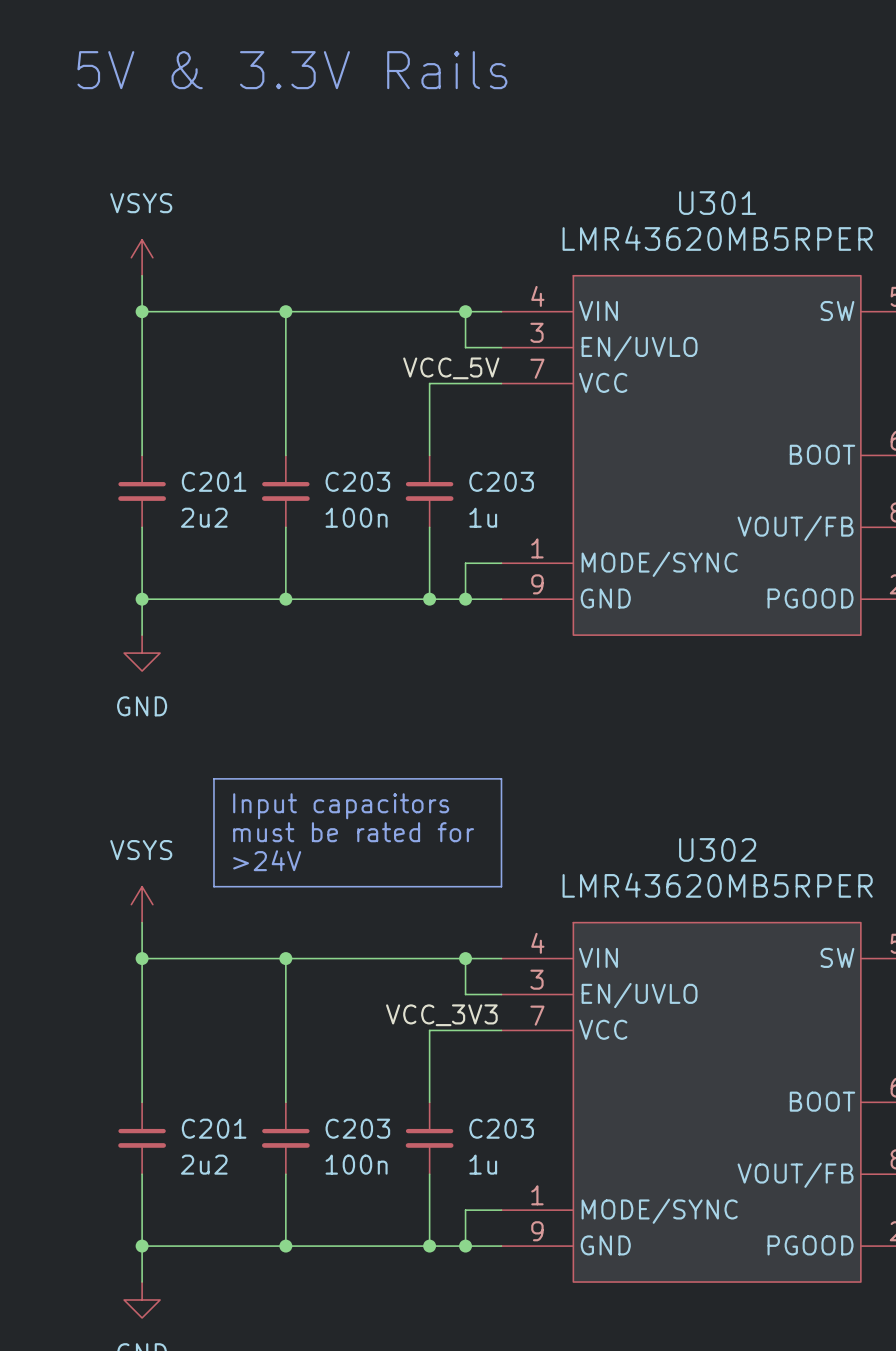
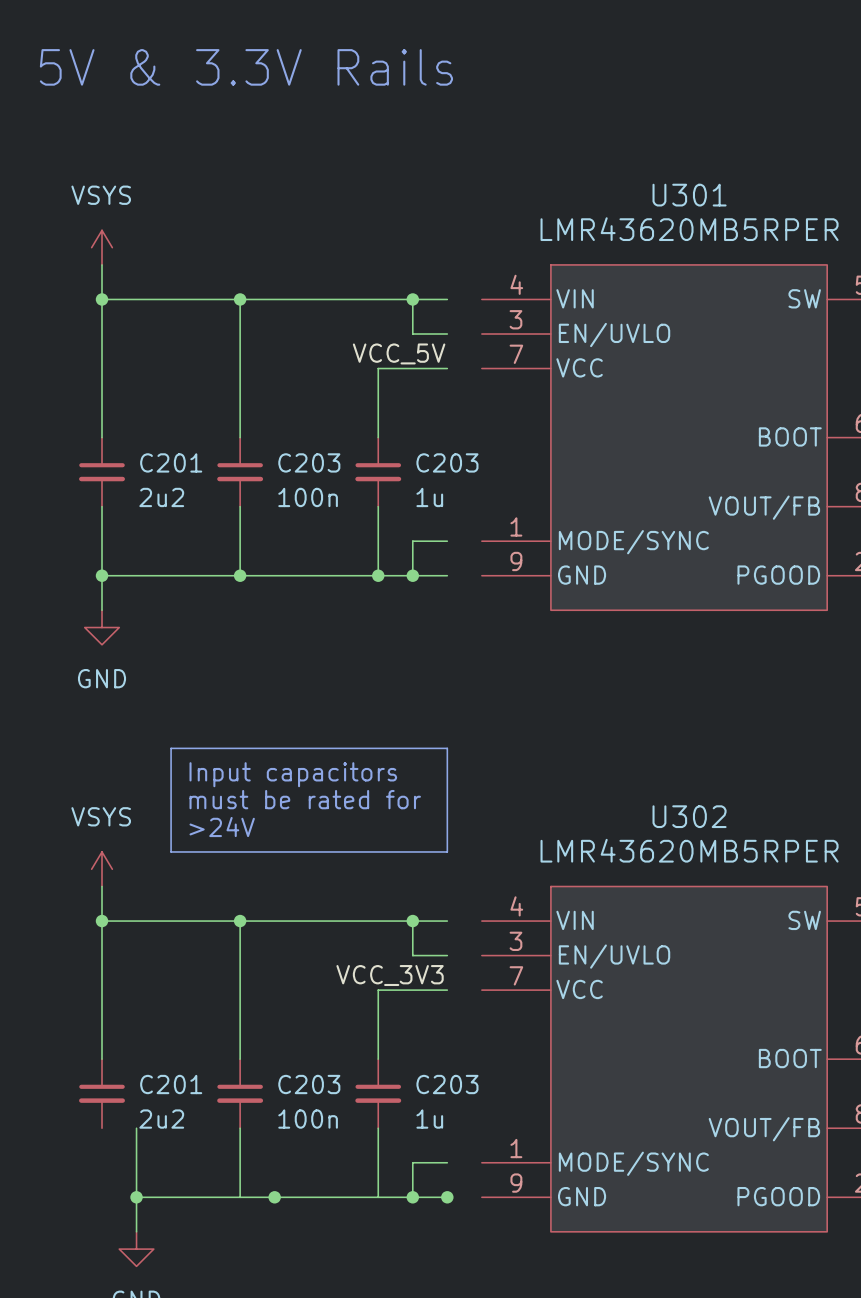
text position: 5V & 3.3V Rails (292, 70) -> 5V & 3.3V Rails (246, 67)
power symbol position: VSYS (142, 257) -> VSYS (102, 247)
wire: (142, 275) (142, 455) -> (102, 264) (102, 437)
wire: none -> (102, 299) (136, 299)
junction position: (142, 311) -> (102, 299)
wire: (285, 311) (285, 455) -> (240, 299) (240, 437)
junction position: (285, 311) -> (240, 299)
wire: none -> (412, 299) (412, 334) (447, 334)
junction position: (465, 311) -> (412, 299)
wire: (501, 311) (465, 311) (465, 347) (501, 347) -> none
label position: VCC_5V (451, 368) -> VCC_5V (399, 353)
wire: (429, 383) (429, 455) -> (412, 368) (378, 368) (378, 437)
wire: (465, 383) (501, 383) -> none
C201 position: (142, 491) -> (102, 472)
C203 position: (285, 491) -> (240, 472)
C203 position: (429, 491) -> (378, 472)
wire: (142, 527) (142, 635) -> (102, 506) (102, 610)
wire: (285, 527) (285, 599) -> (240, 506) (240, 575)
wire: none -> (378, 506) (378, 575)
wire: (429, 527) (429, 563) -> (447, 541) (412, 541)
wire: (501, 563) (465, 563) (465, 599) (501, 599) -> none
wire: none -> (102, 575) (136, 575)
junction position: (142, 599) -> (102, 575)
junction position: (285, 599) -> (240, 575)
junction: none -> (378, 575)
junction: (465, 599) -> none
power symbol position: GND (142, 653) -> GND (102, 627)
line: (213, 778) (213, 886) -> (205, 748) (171, 748) (171, 851) (205, 851)
line: (465, 778) (501, 778) (501, 886) (465, 886) -> (447, 748) (447, 851)
text position: Input capacitors (341, 806) -> Input capacitors (293, 774)
text position: must be rated for (353, 832) -> must be rated for (305, 799)
text position: >24V (267, 860) -> >24V (222, 827)
power symbol position: VSYS (142, 904) -> VSYS (102, 869)
wire: (142, 922) (142, 1102) -> (102, 886) (102, 1059)
wire: none -> (102, 921) (136, 921)
junction position: (142, 958) -> (102, 921)
wire: (285, 958) (285, 1102) -> (240, 921) (240, 1059)
junction position: (285, 958) -> (240, 921)
wire: none -> (412, 921) (412, 955) (447, 955)
junction position: (465, 958) -> (412, 921)
wire: (501, 958) (465, 958) (465, 994) (501, 994) -> none
label position: VCC_3V3 (441, 1015) -> VCC_3V3 (390, 975)
wire: (429, 1030) (429, 1102) -> (412, 990) (378, 990) (378, 1059)
wire: (465, 1030) (501, 1030) -> none
C201 position: (142, 1138) -> (102, 1093)
C203 position: (285, 1138) -> (240, 1093)
C203 position: (429, 1138) -> (378, 1093)
wire: (285, 1174) (285, 1246) -> (240, 1128) (240, 1197)
wire: none -> (378, 1128) (378, 1197)
wire: (429, 1174) (429, 1210) -> (447, 1162) (412, 1162)
wire: (501, 1210) (465, 1210) (465, 1246) (501, 1246) -> none

